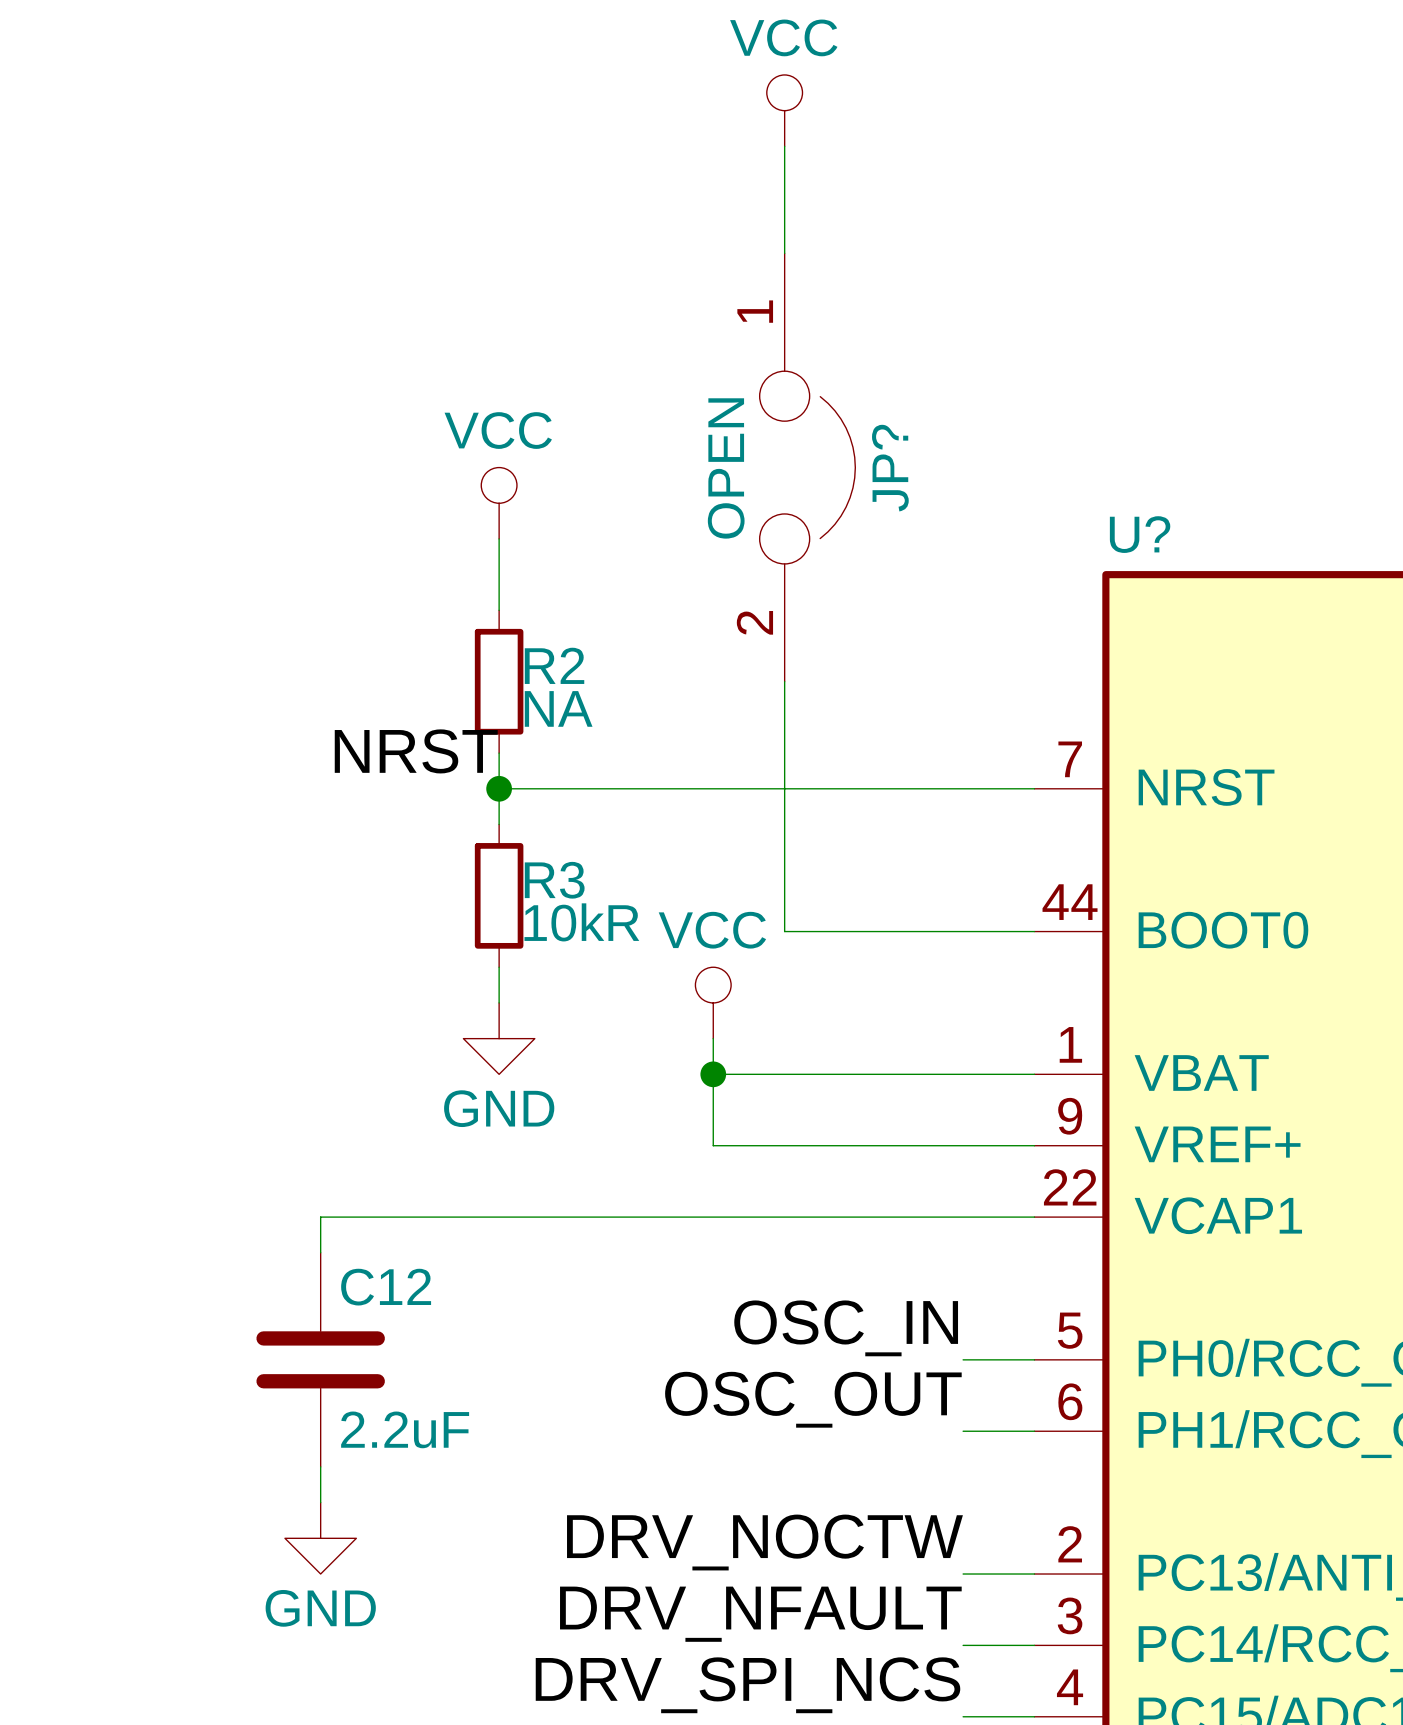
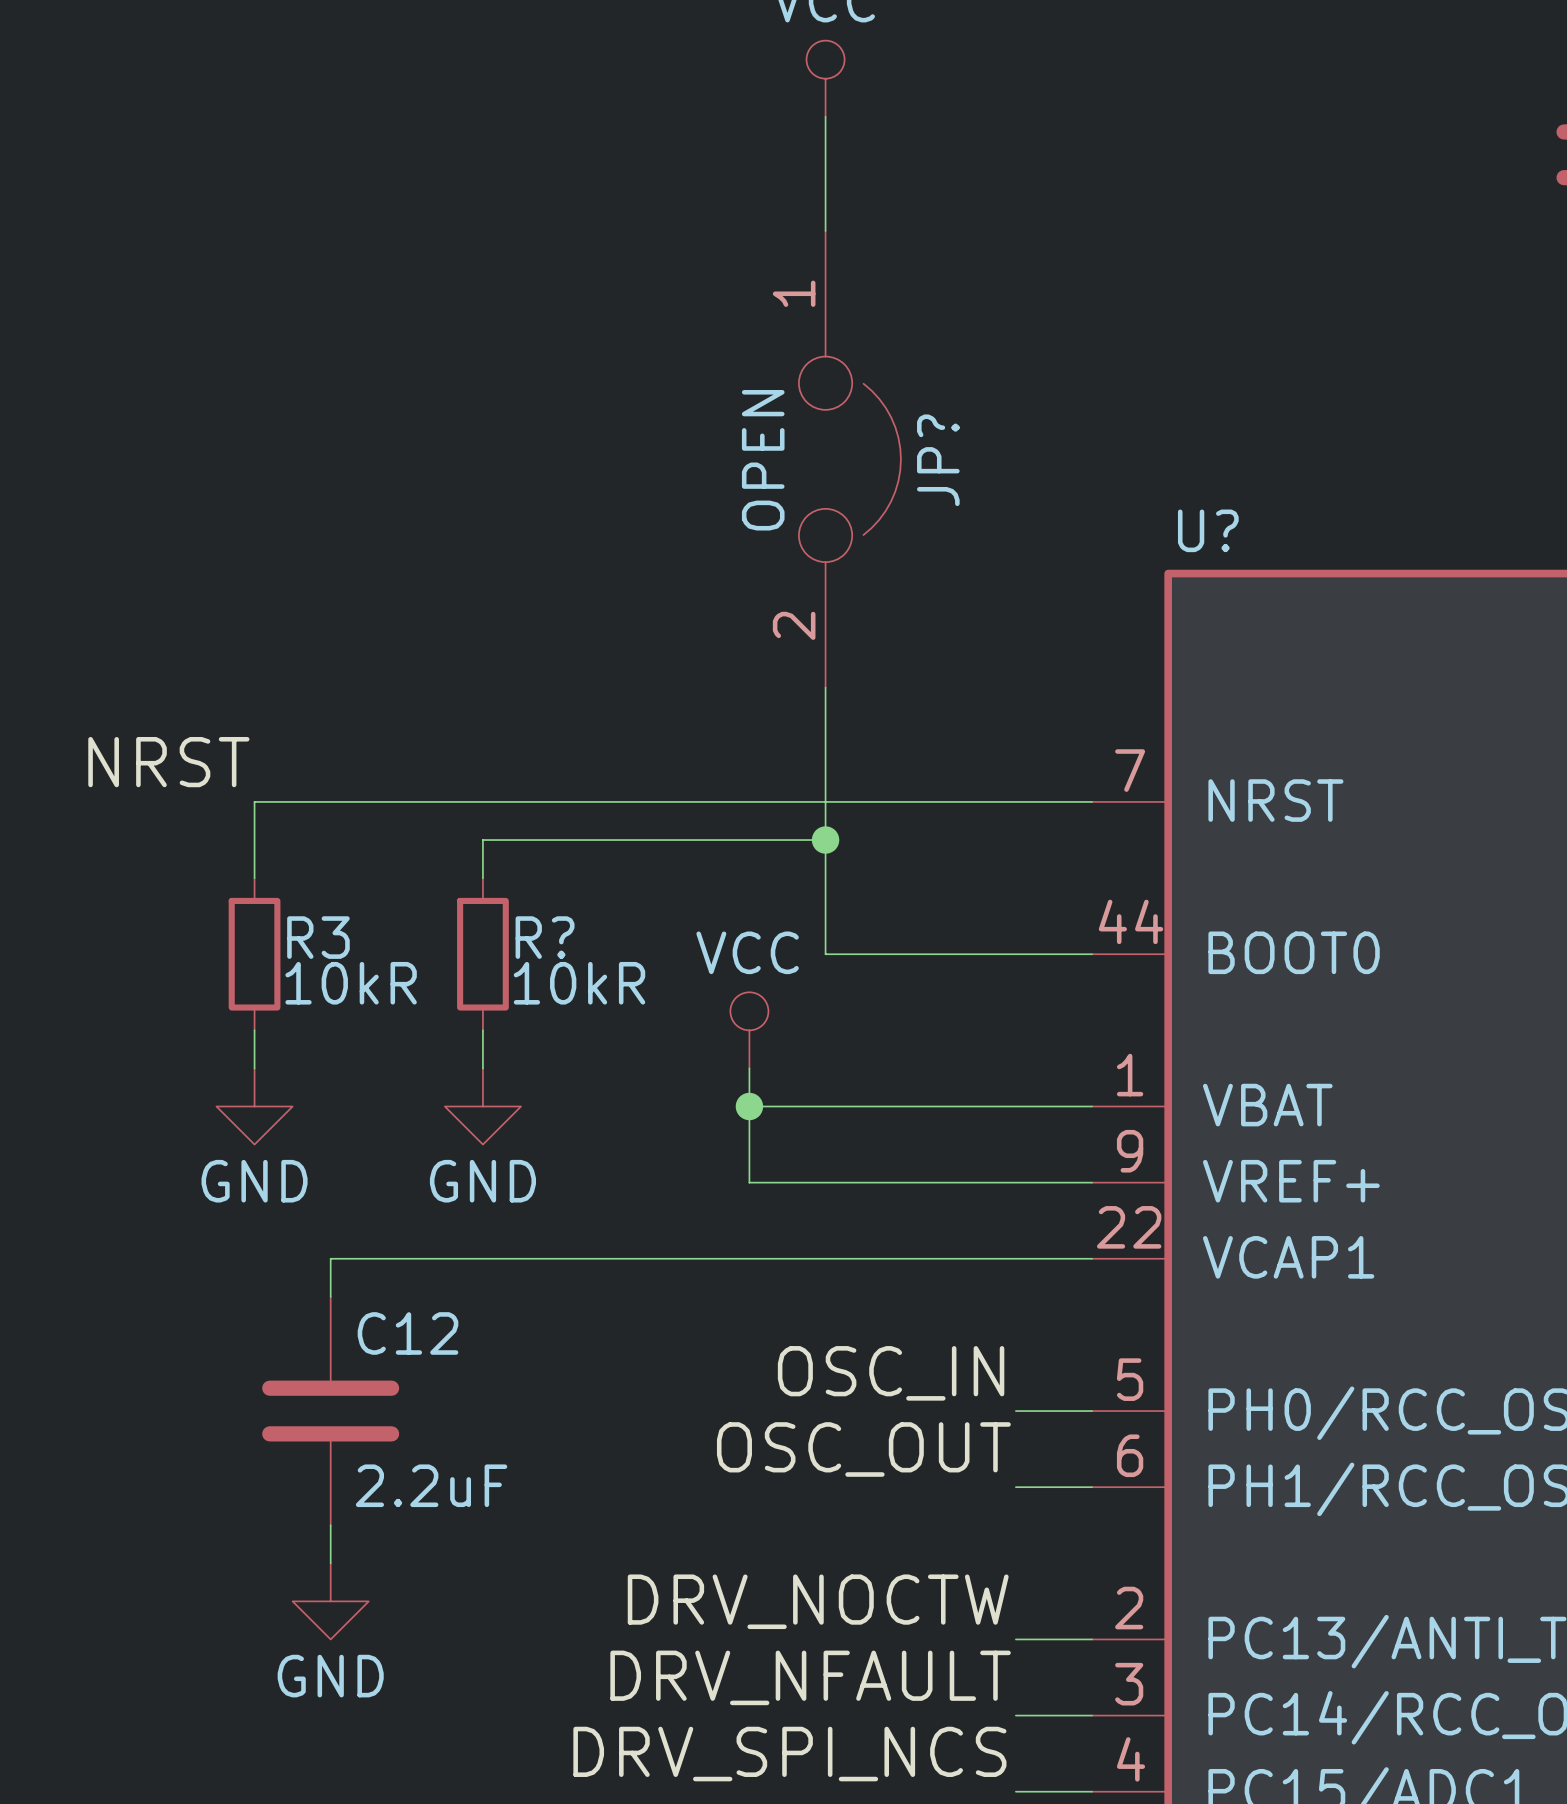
power symbol: VCC (499, 503) -> none
wire: (499, 538) (499, 610) -> none
R2: NA (499, 681) -> none
label position: NRST (416, 751) -> NRST (168, 762)
wire: (499, 753) (499, 824) -> none
wire: none -> (521, 801) (254, 801) (254, 878)
junction: (499, 788) -> none
wire: none -> (825, 840) (482, 840) (482, 878)
junction: none -> (825, 840)
R3 position: (499, 895) -> (254, 954)
R?: none -> 10kR (482, 954)
wire: (499, 967) (499, 1002) -> (482, 1030) (482, 1068)
wire: none -> (254, 1030) (254, 1068)
power symbol position: GND (499, 1038) -> GND (482, 1106)
power symbol: none -> GND (254, 1106)

